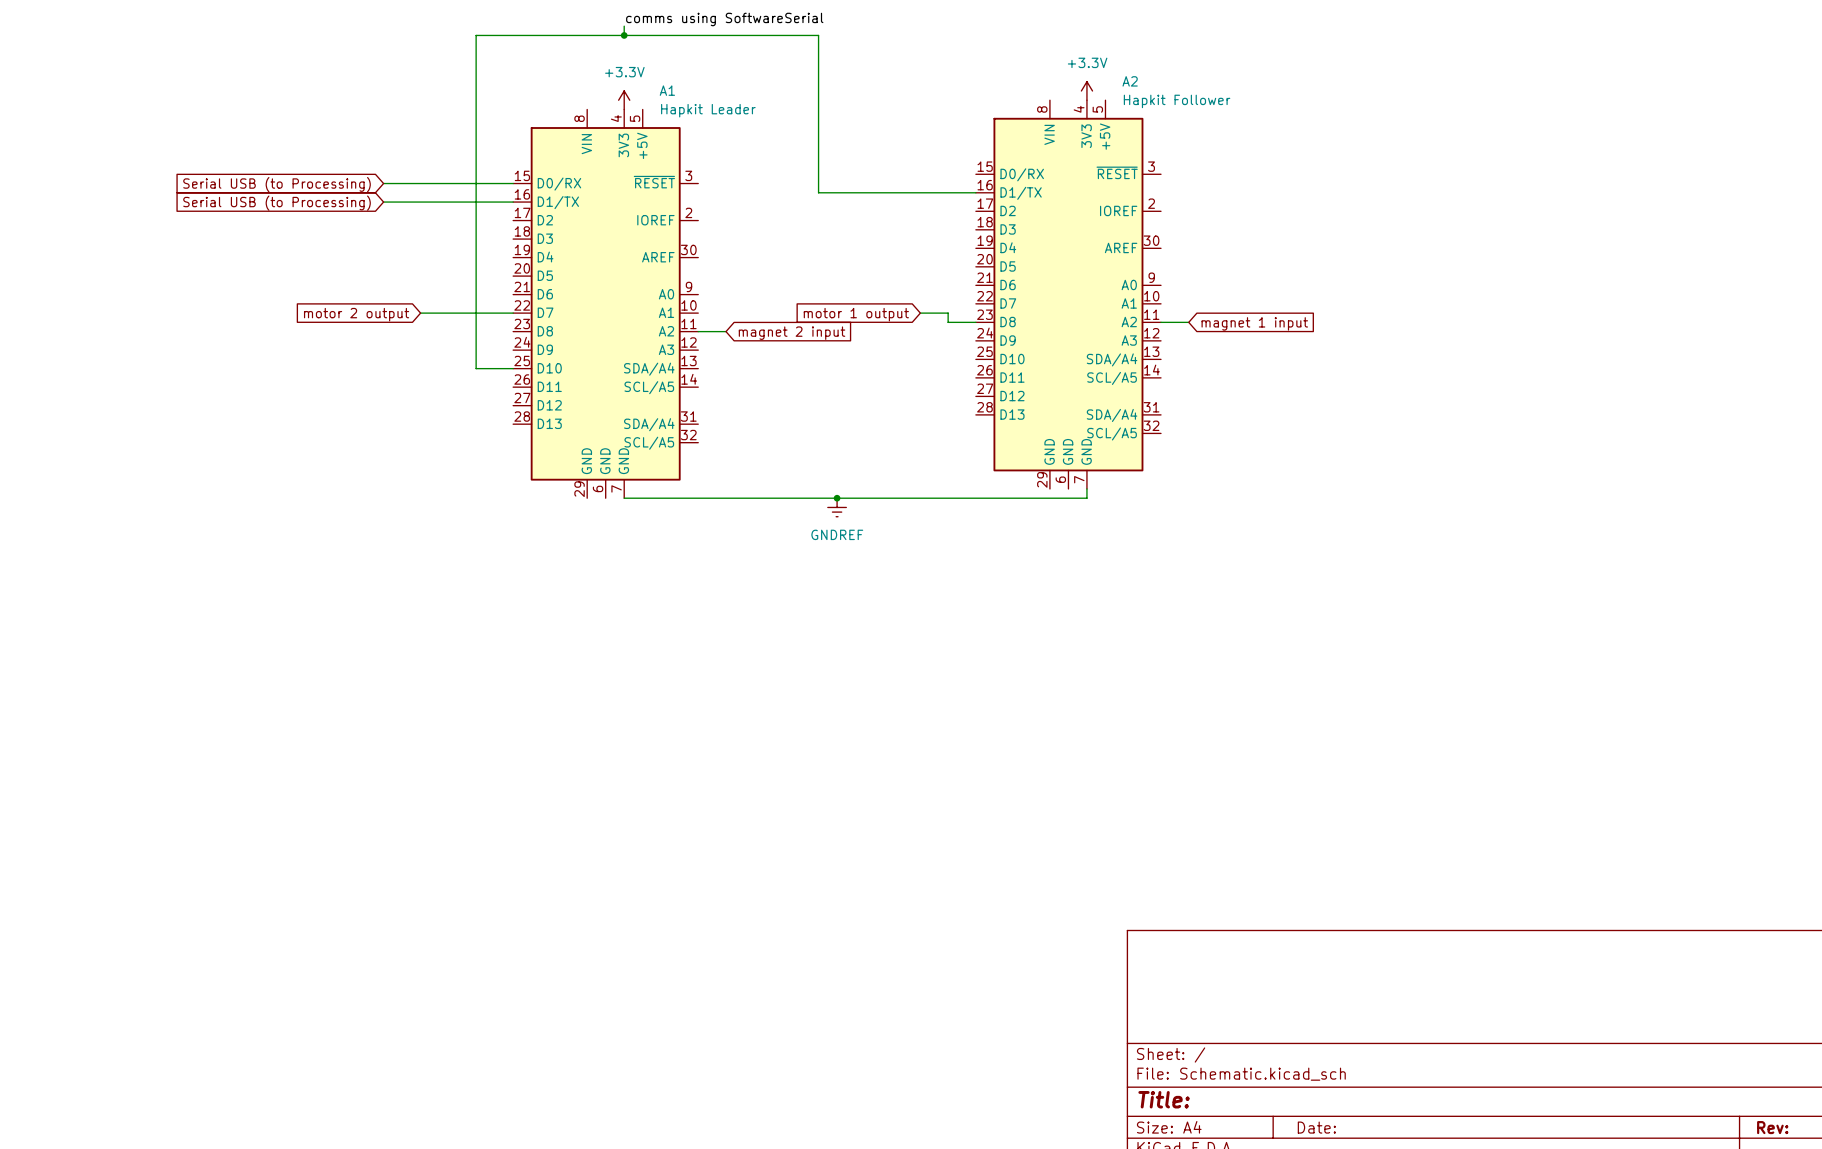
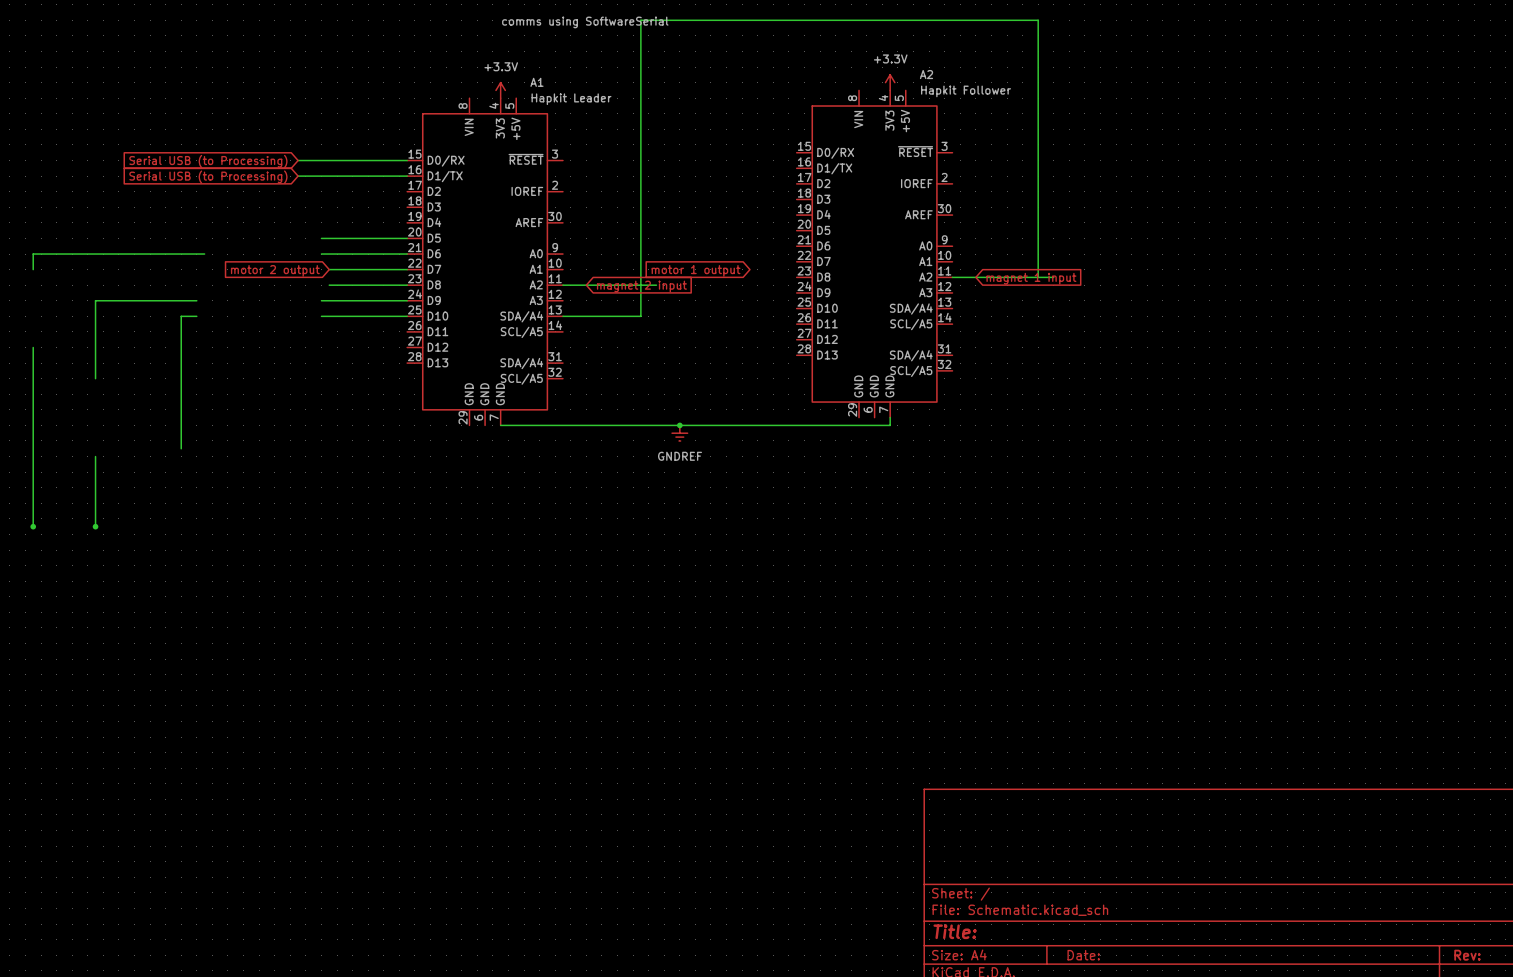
wire: (624, 26) (624, 35) -> none
junction: (624, 35) -> none
wire: (975, 192) (818, 192) (818, 35) (476, 35) (476, 368) -> (321, 316) (376, 316)
wire: none -> (321, 238) (407, 238)
wire: none -> (204, 254) (33, 254) (33, 269)
wire: none -> (321, 254) (407, 254)
wire: (920, 313) (948, 313) (948, 322) (975, 322) -> none
wire: none -> (975, 277) (1053, 277)
wire: none -> (1038, 277) (1038, 20) (640, 20) (640, 316) (562, 316)
wire: none -> (329, 285) (407, 285)
wire: none -> (586, 285) (656, 285)
wire: none -> (196, 300) (95, 300) (95, 378)
wire: none -> (321, 300) (407, 300)
wire: none -> (196, 316) (181, 316) (181, 448)
wire: none -> (33, 347) (33, 526)
wire: none -> (95, 456) (95, 526)
junction: none -> (33, 526)
junction: none -> (95, 526)

